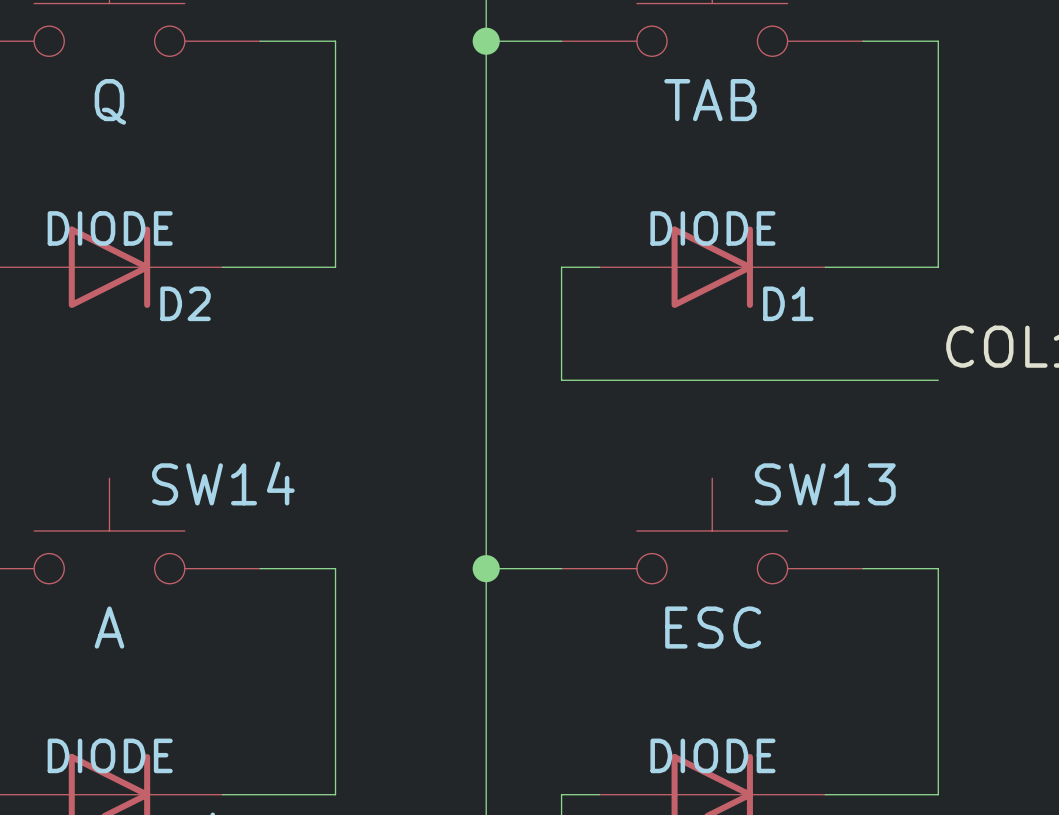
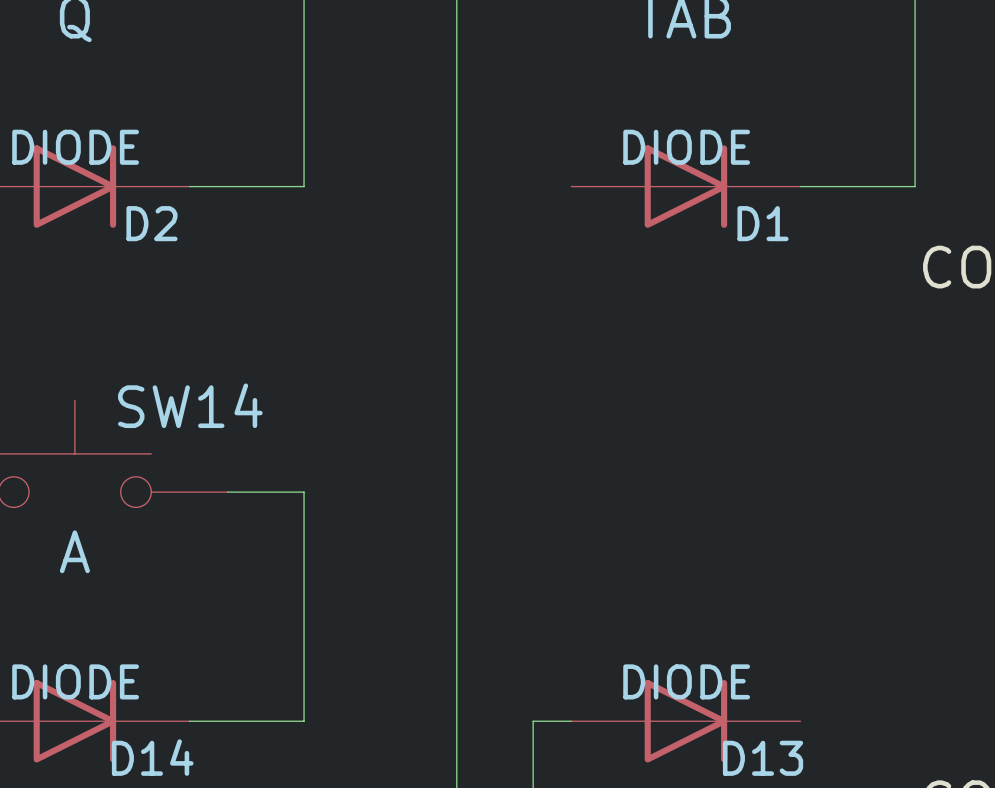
wire: (599, 267) (561, 267) (561, 380) (938, 380) -> none
SW13: ESC (712, 530) -> none
wire: (486, 568) (561, 568) -> none
junction: (486, 568) -> none
wire: (862, 568) (938, 568) (938, 794) (825, 794) -> none

